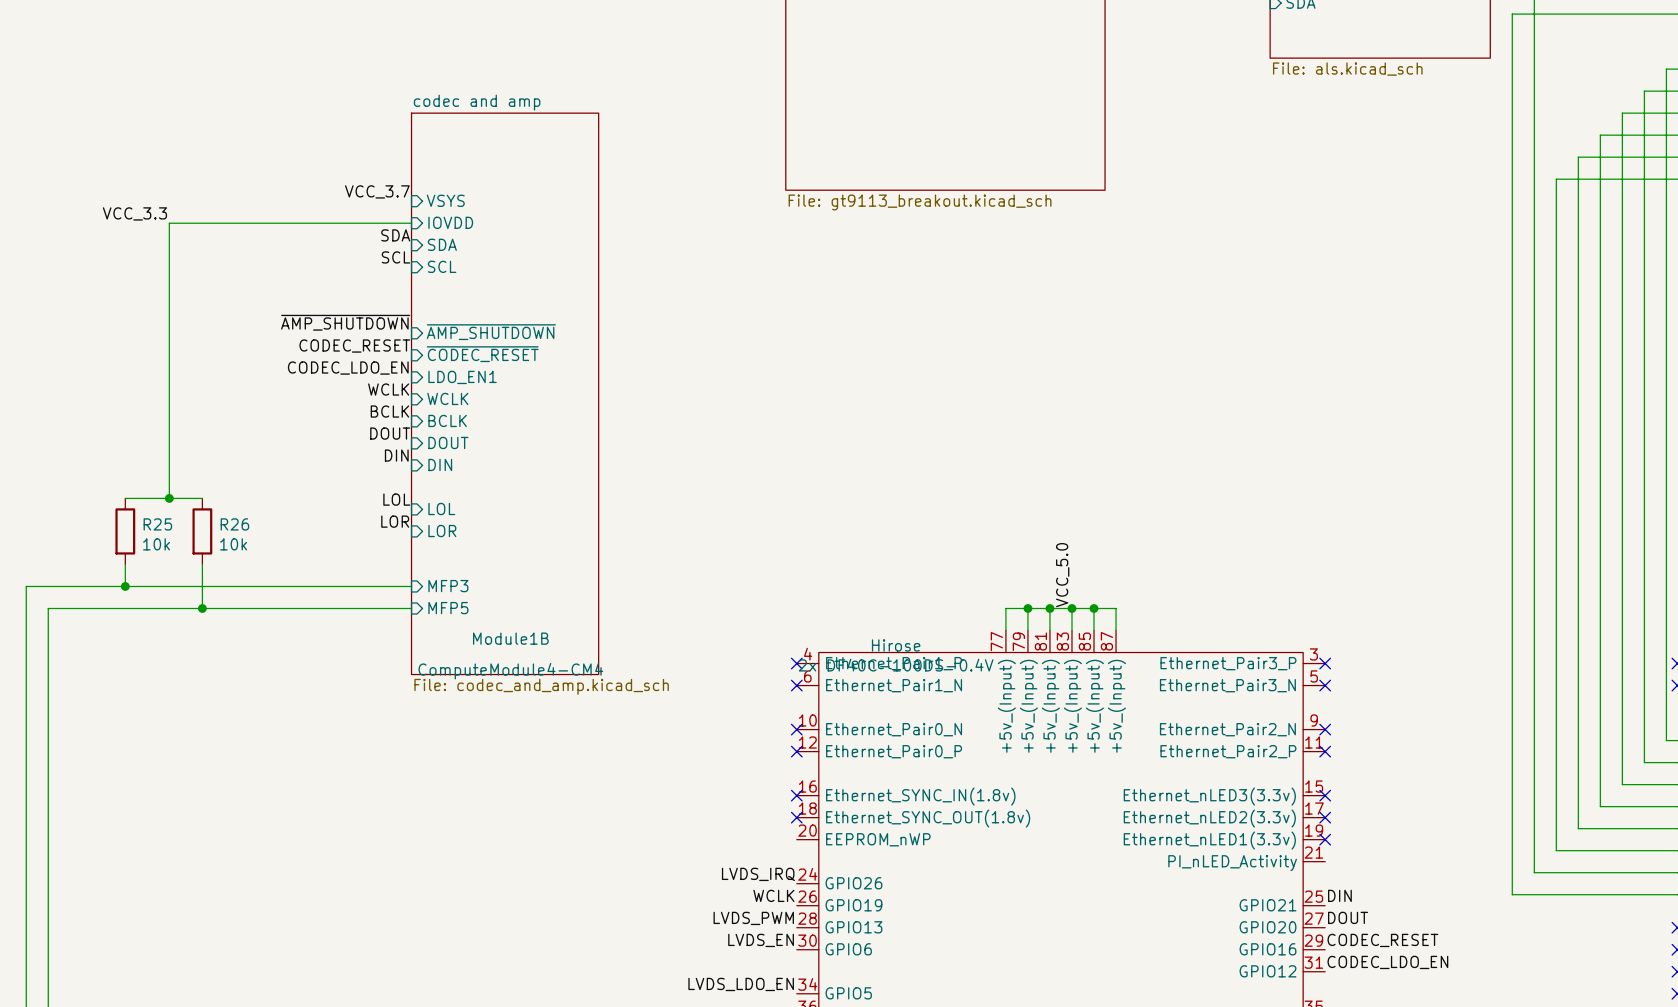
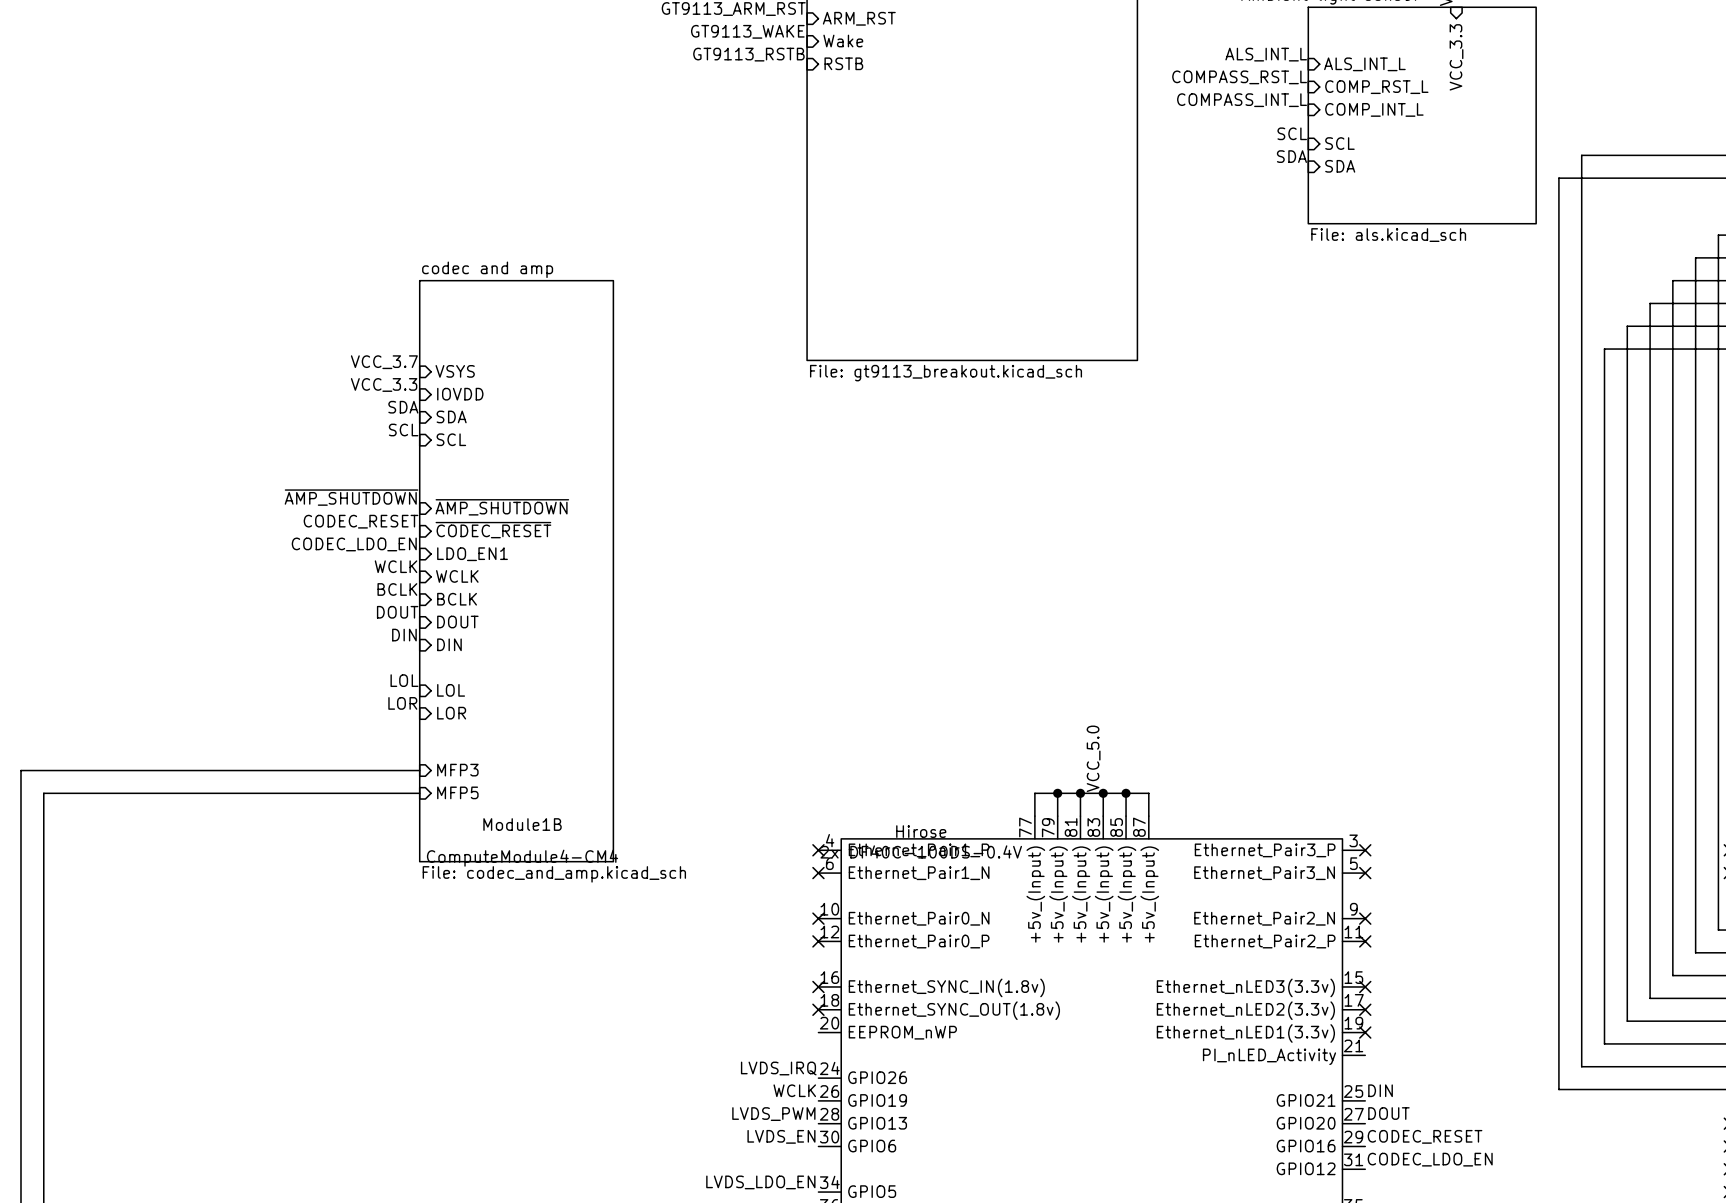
label: VCC_3.3 (134, 213) -> none
label: none -> VCC_3.3 (384, 384)
wire: (411, 223) (169, 223) (169, 498) -> none
wire: (125, 498) (202, 498) -> none
junction: (169, 498) -> none
R25: 10k (125, 531) -> none
R26: 10k (202, 531) -> none
wire: (125, 564) (125, 586) -> none
wire: (202, 564) (202, 608) -> none
junction: (125, 586) -> none
junction: (202, 608) -> none

